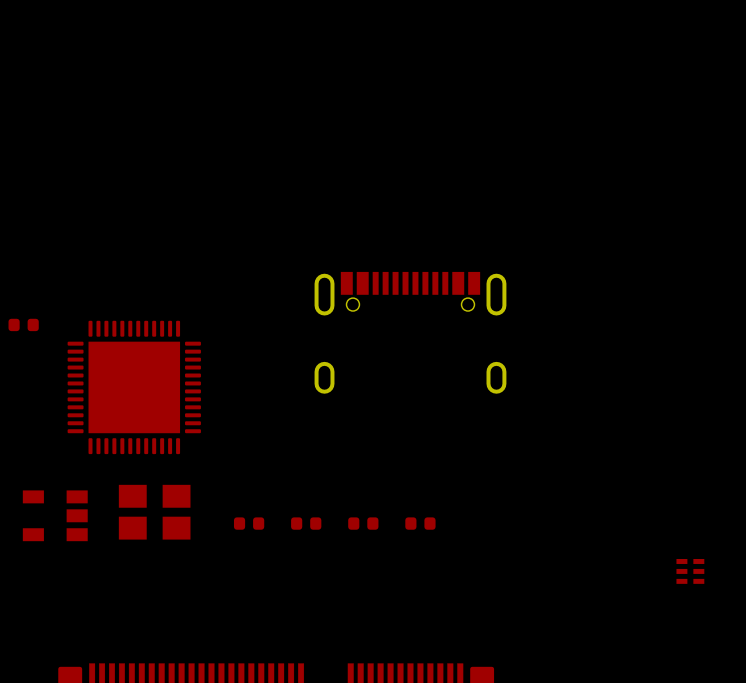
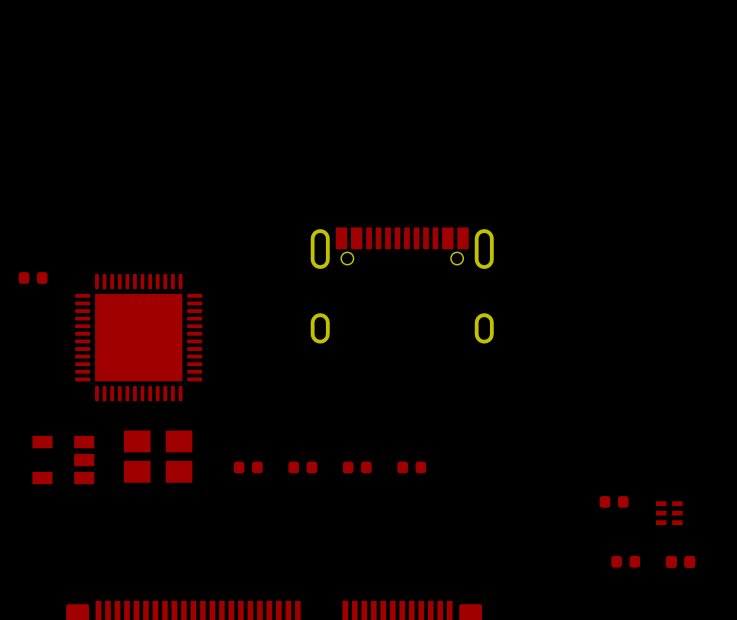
part: none -> (614, 501)
part: none -> (625, 561)
part: none -> (680, 561)

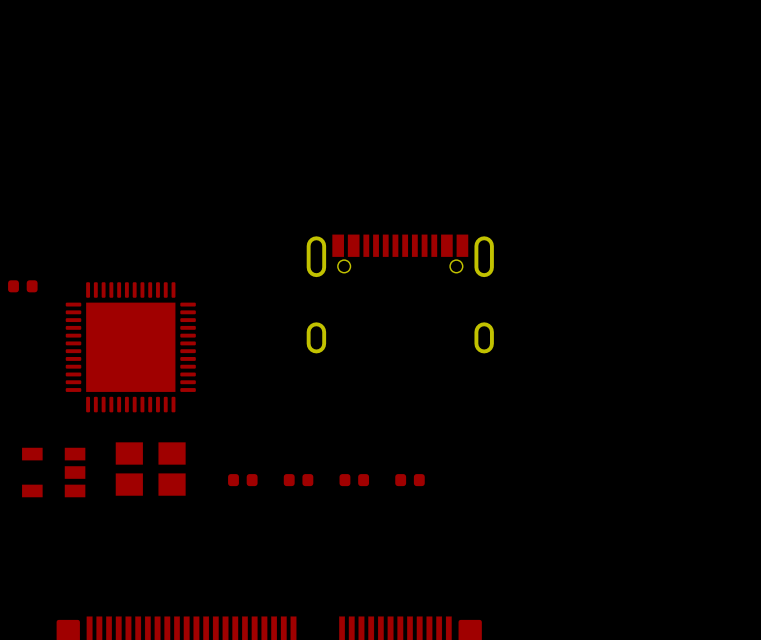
part: (614, 501) -> none
part: (669, 513) -> none
part: (625, 561) -> none
part: (680, 561) -> none

